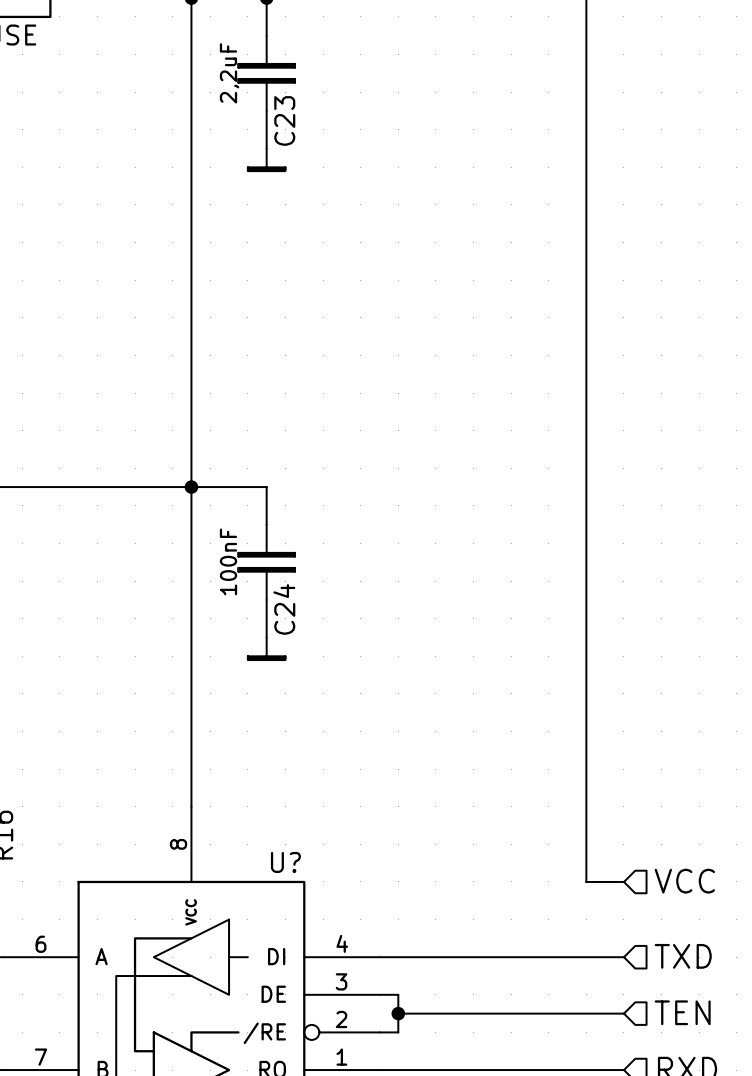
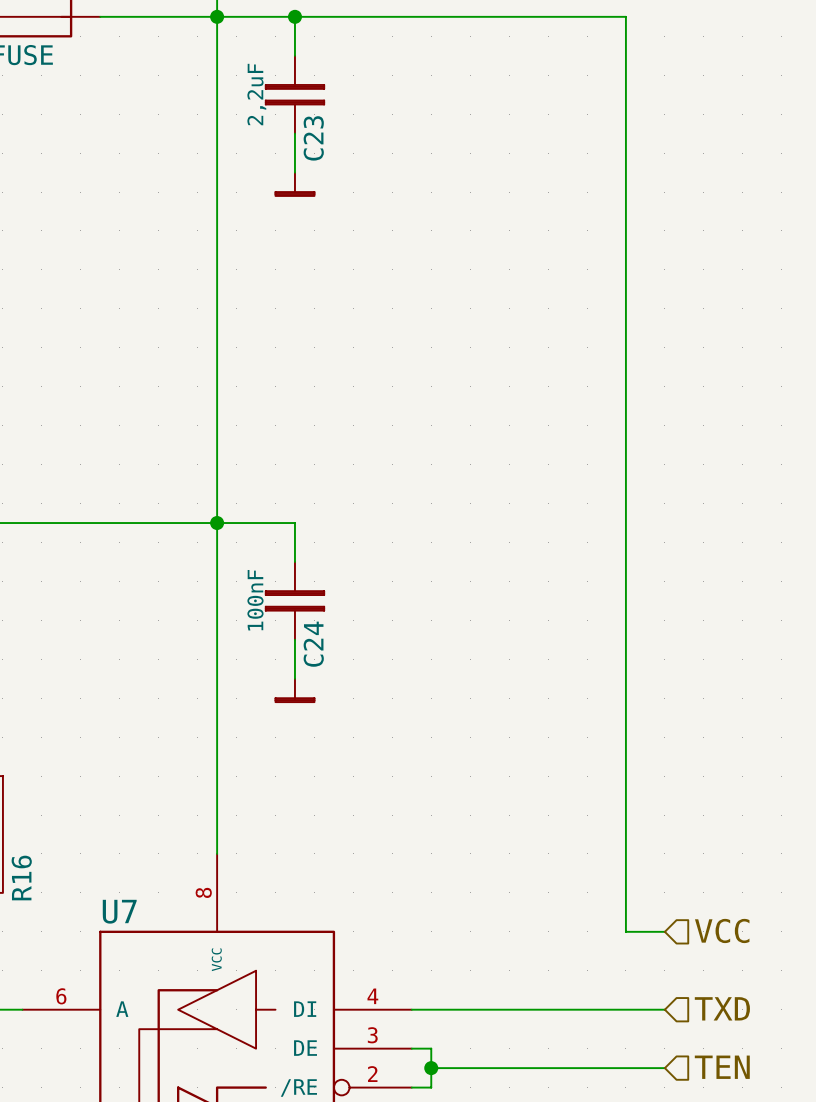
U? name: U? (285, 862) -> U7 (119, 911)

